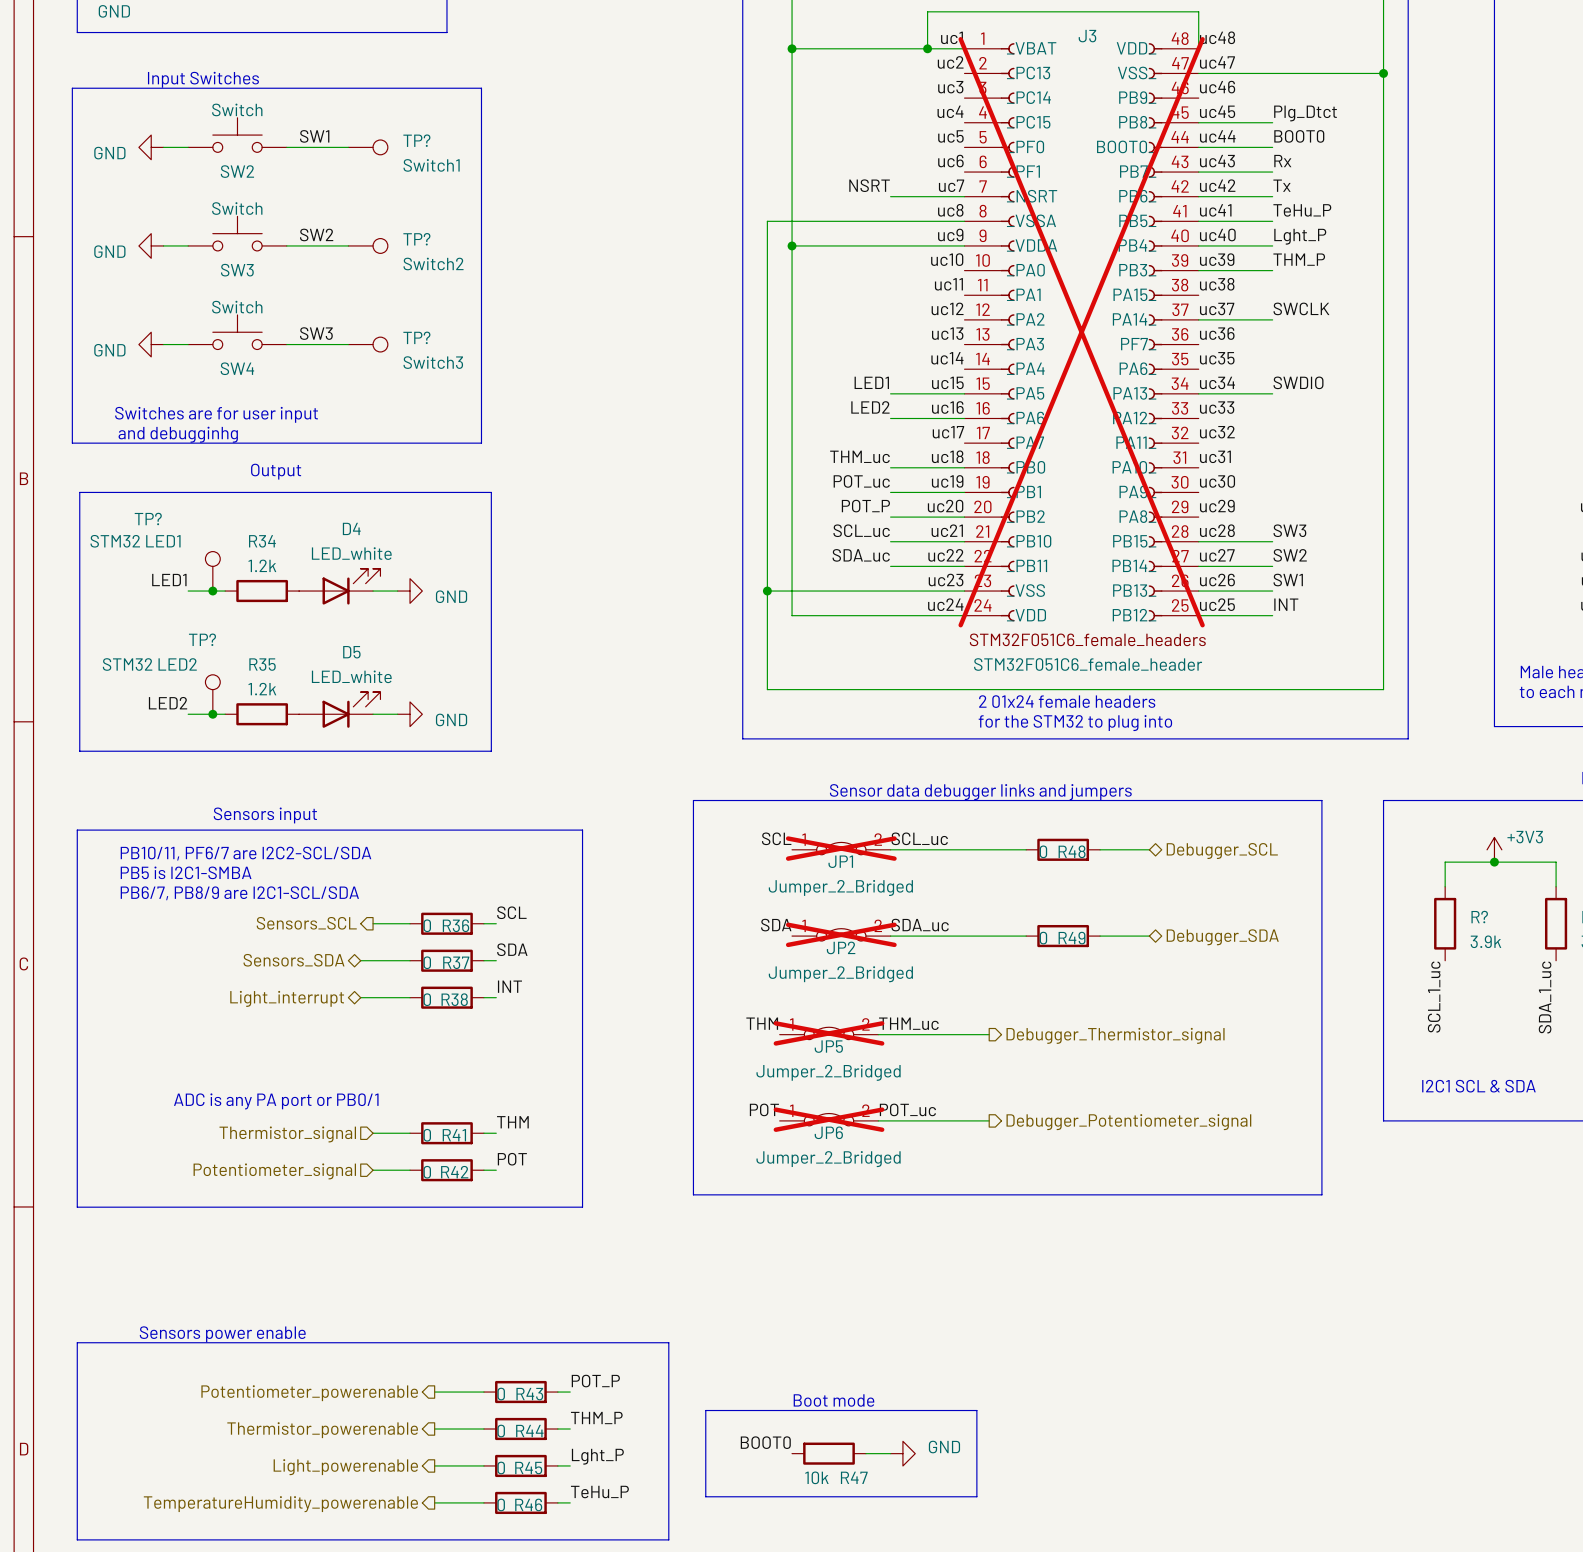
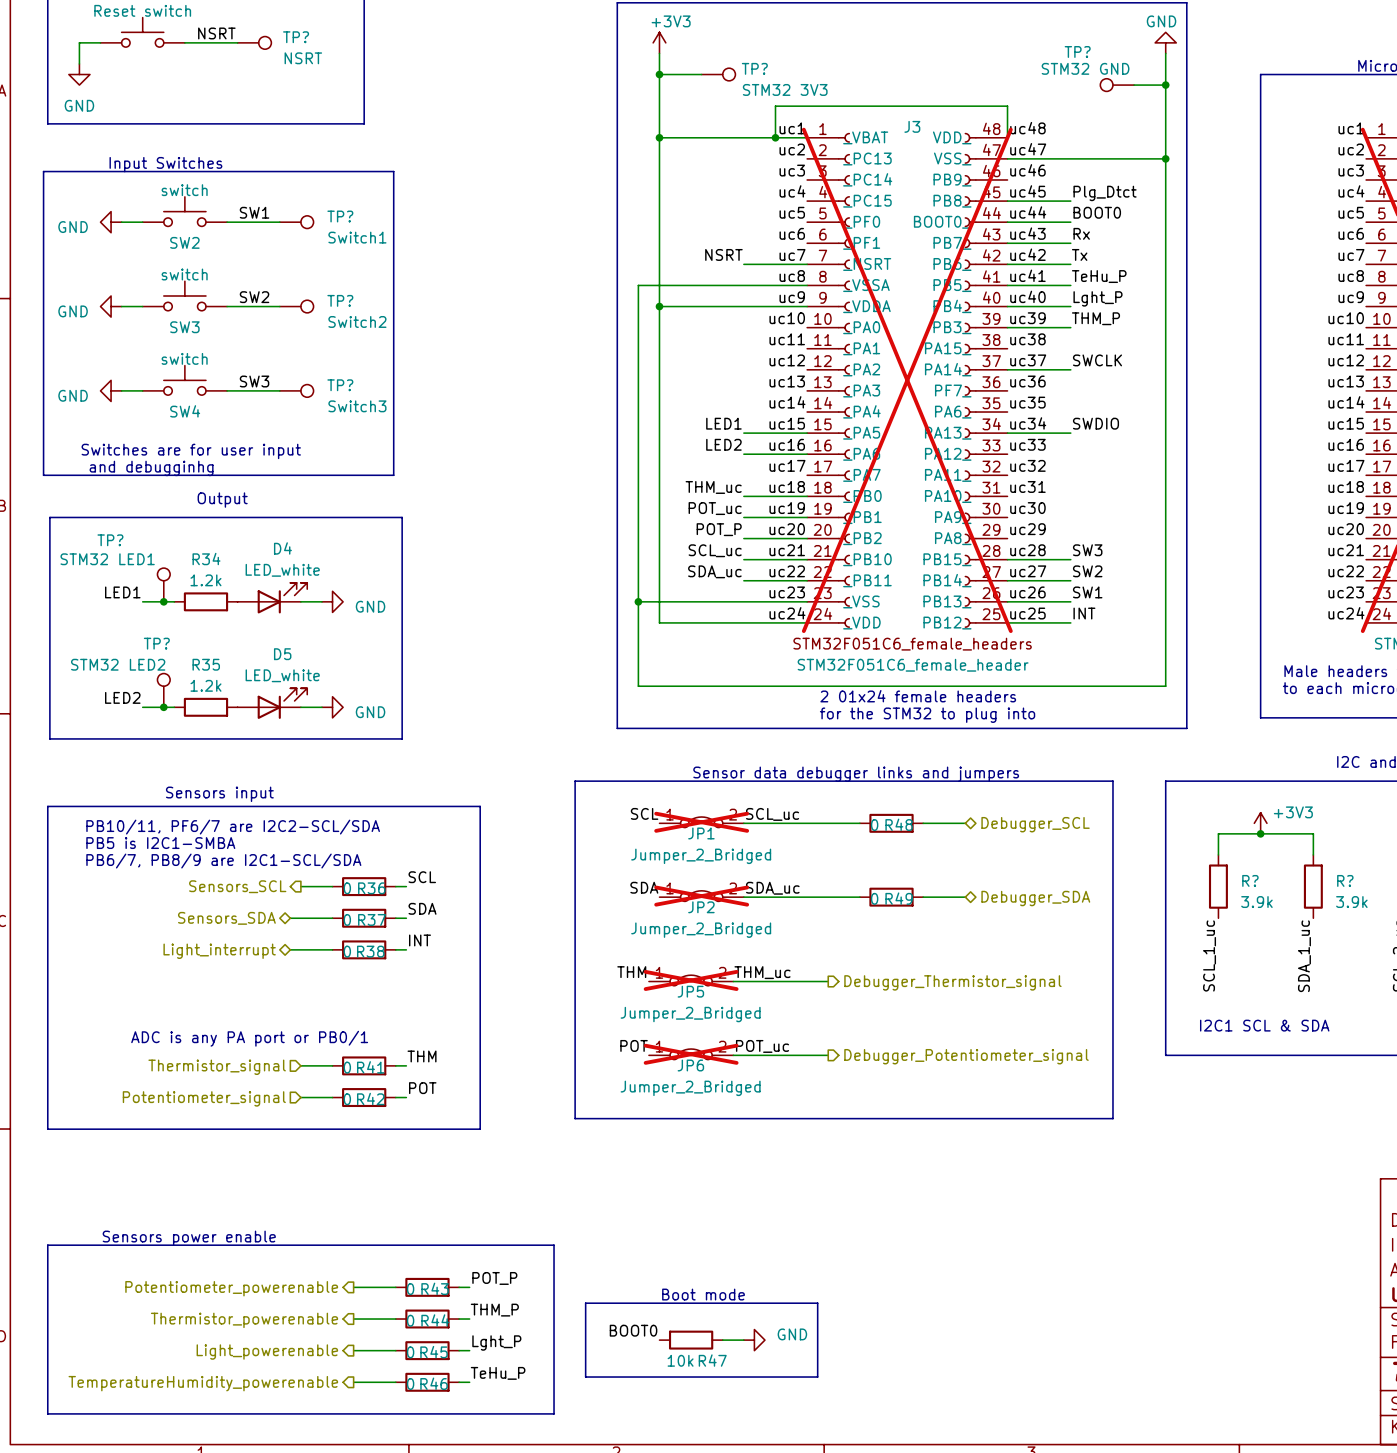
SW2 value: Switch (237, 109) -> switch (184, 190)
SW3 value: Switch (237, 208) -> switch (184, 274)
SW4 value: Switch (237, 307) -> switch (184, 358)

